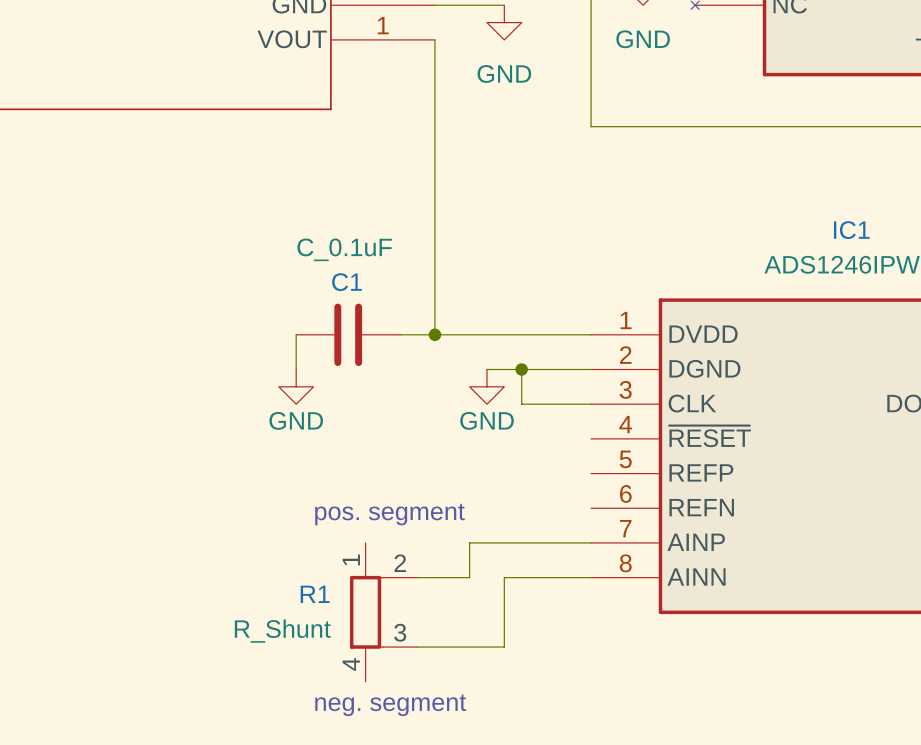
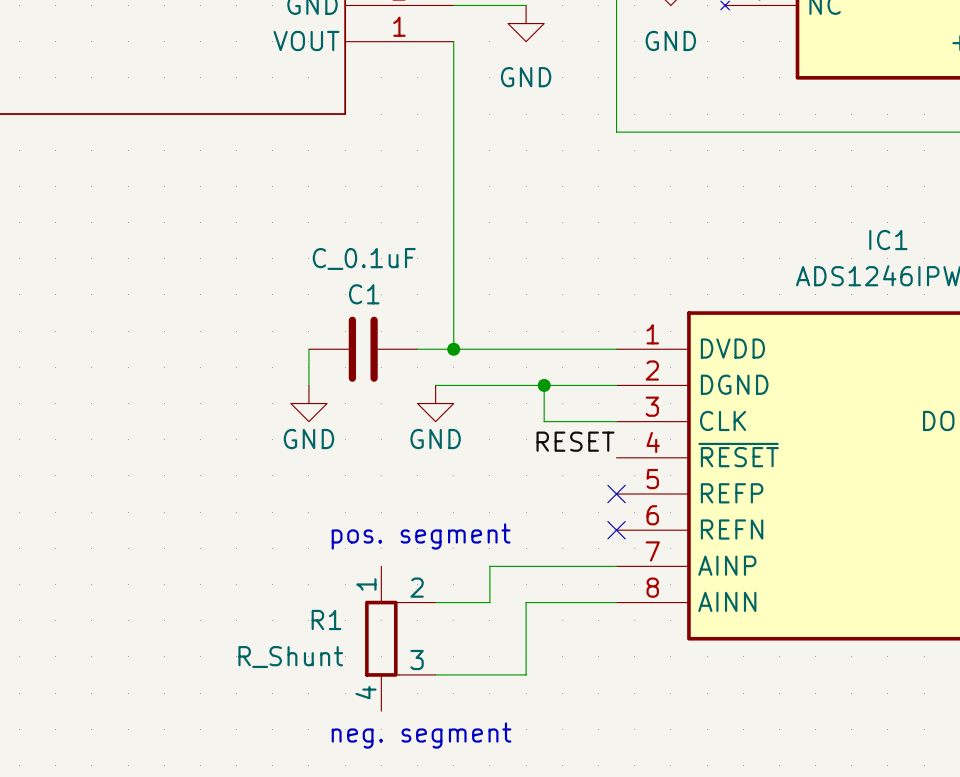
wire: none -> (435, 385) (507, 385)
power symbol position: GND (486, 386) -> GND (435, 403)
label: none -> RESET (575, 441)
no-connect mark: none -> (616, 494)
no-connect mark: none -> (616, 530)

